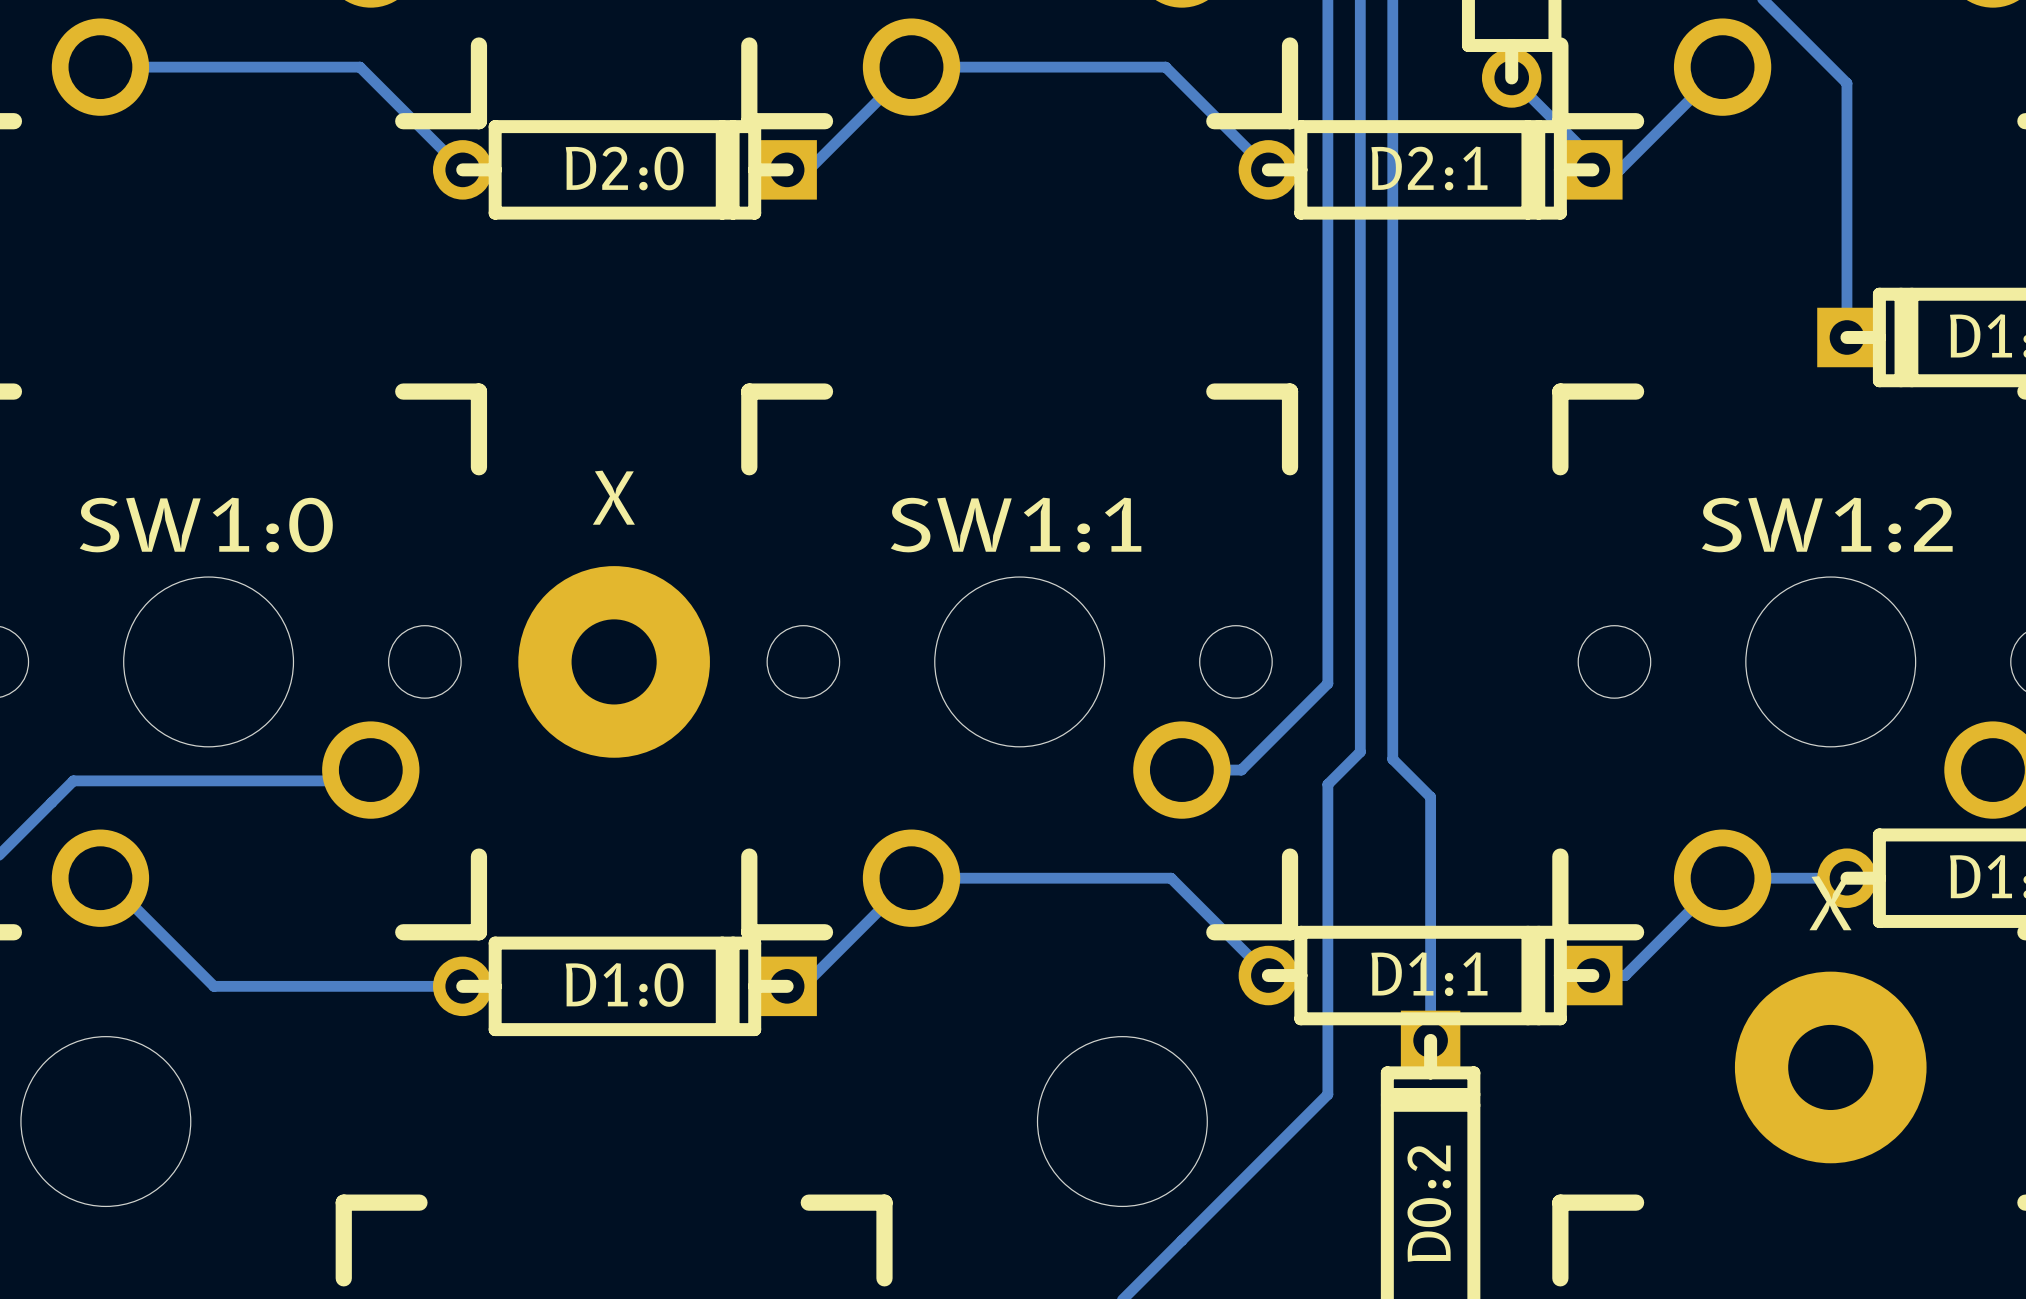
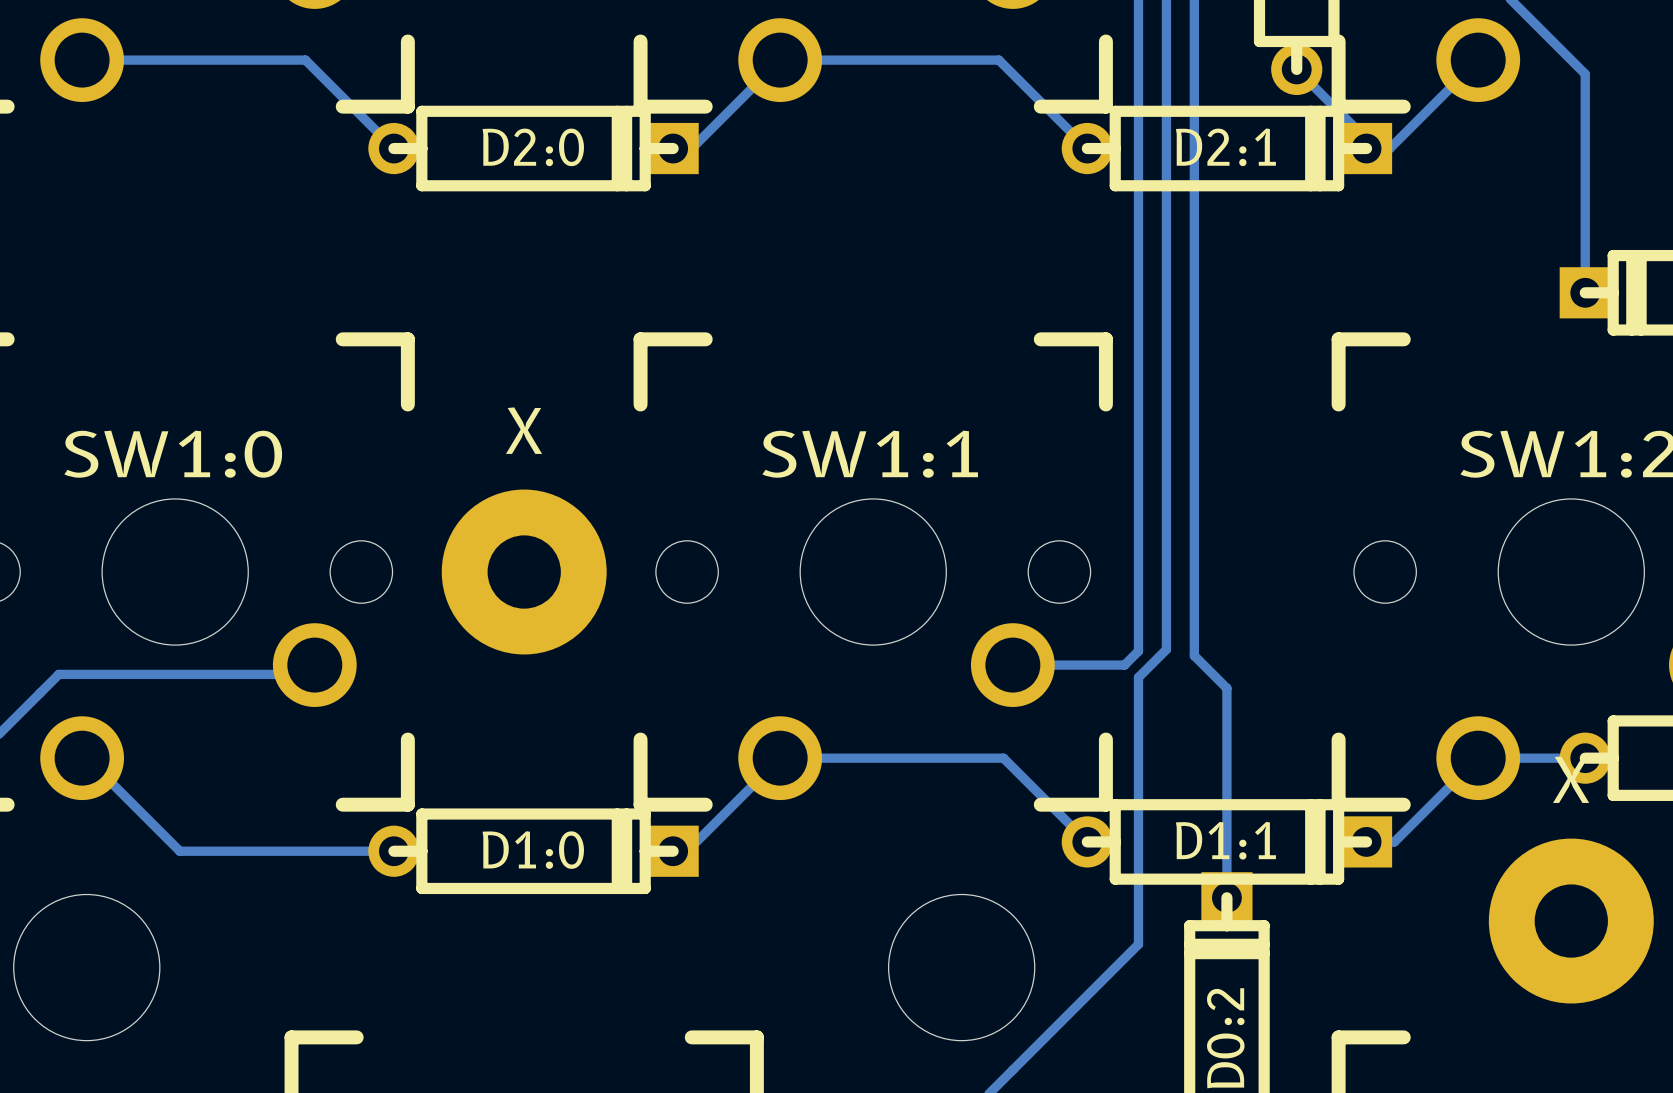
bottom track: (1327, 683) (1241, 770) -> (1138, 590) (1138, 651) (1124, 665) (1064, 665)

